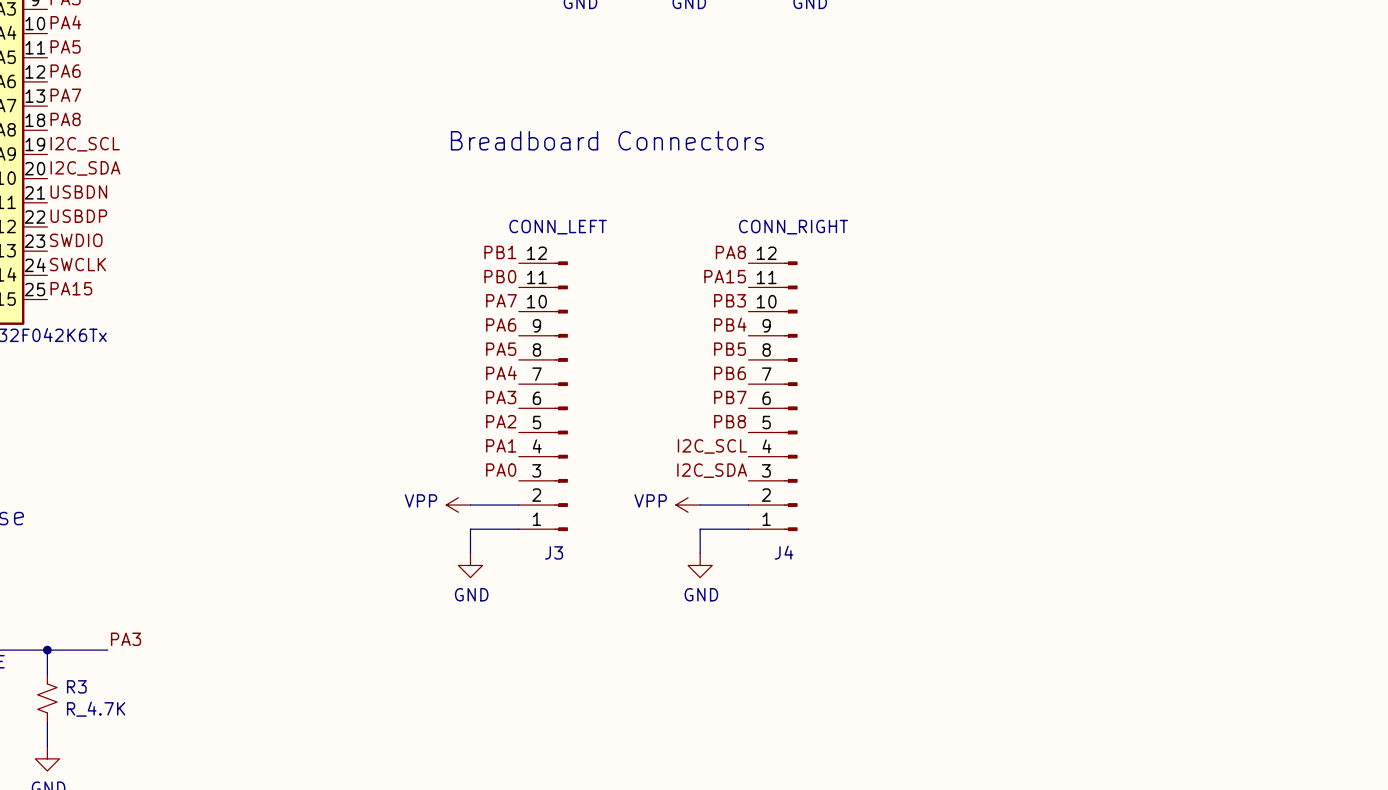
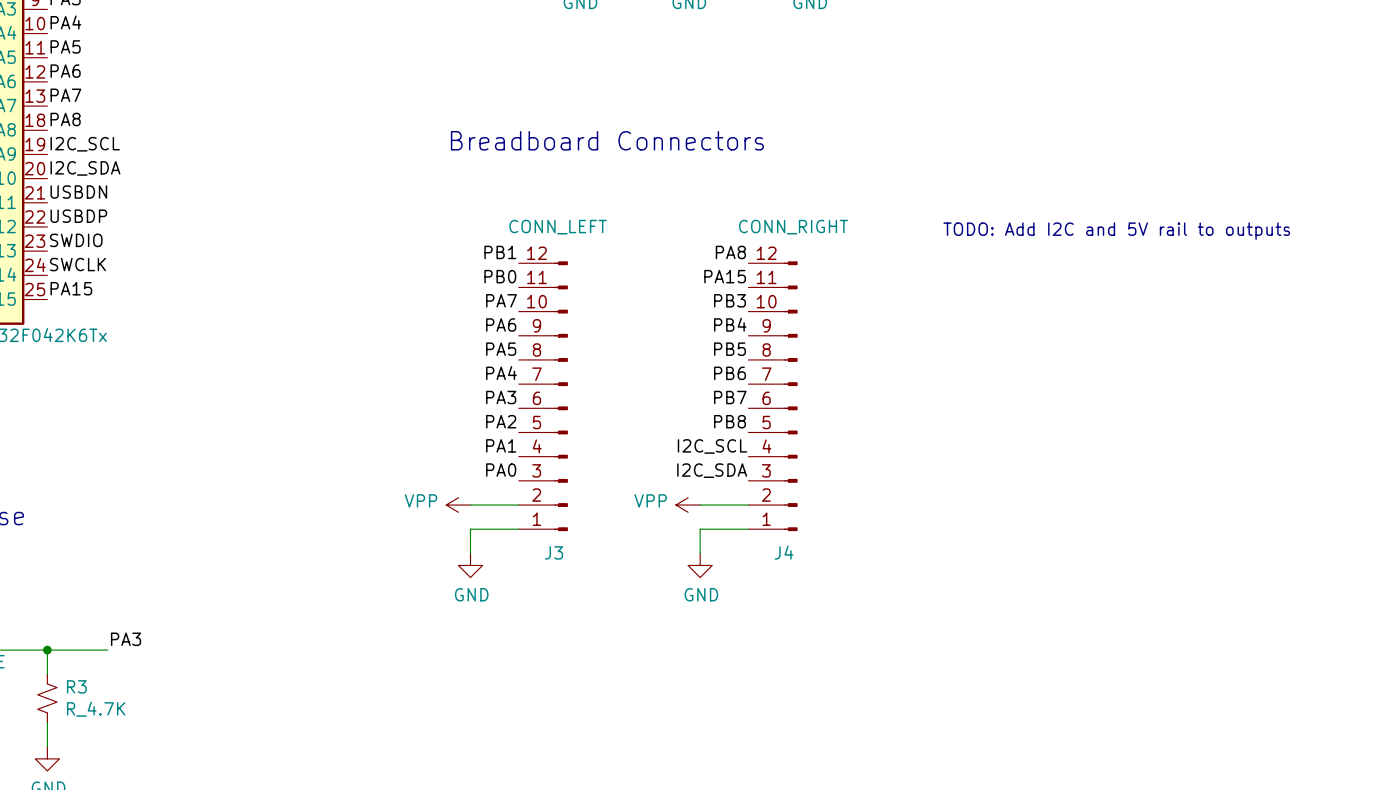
text: none -> TODO: Add I2C and 5V rail to outputs (1116, 231)

